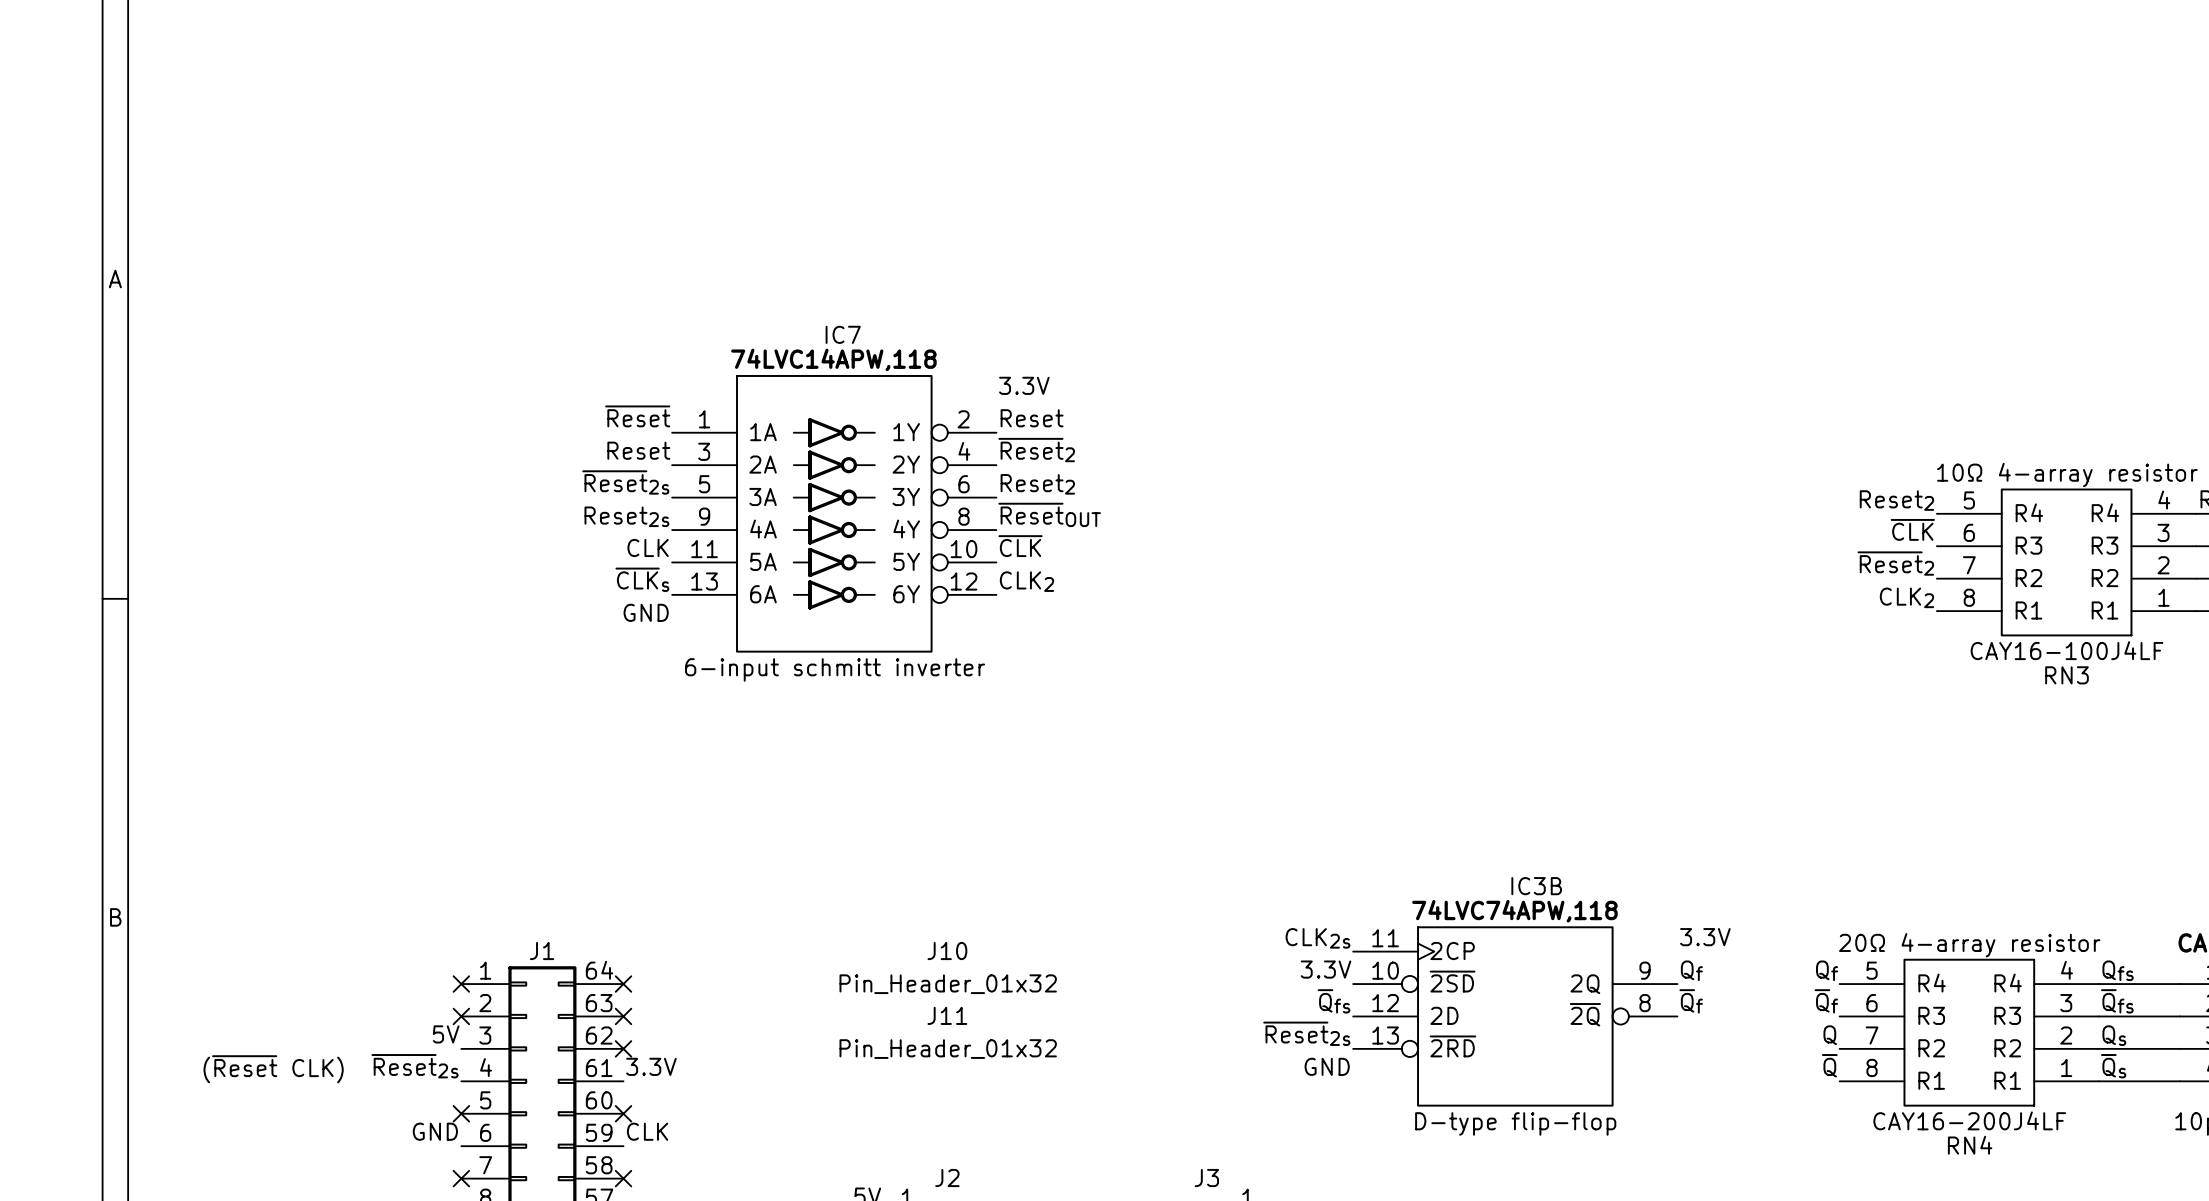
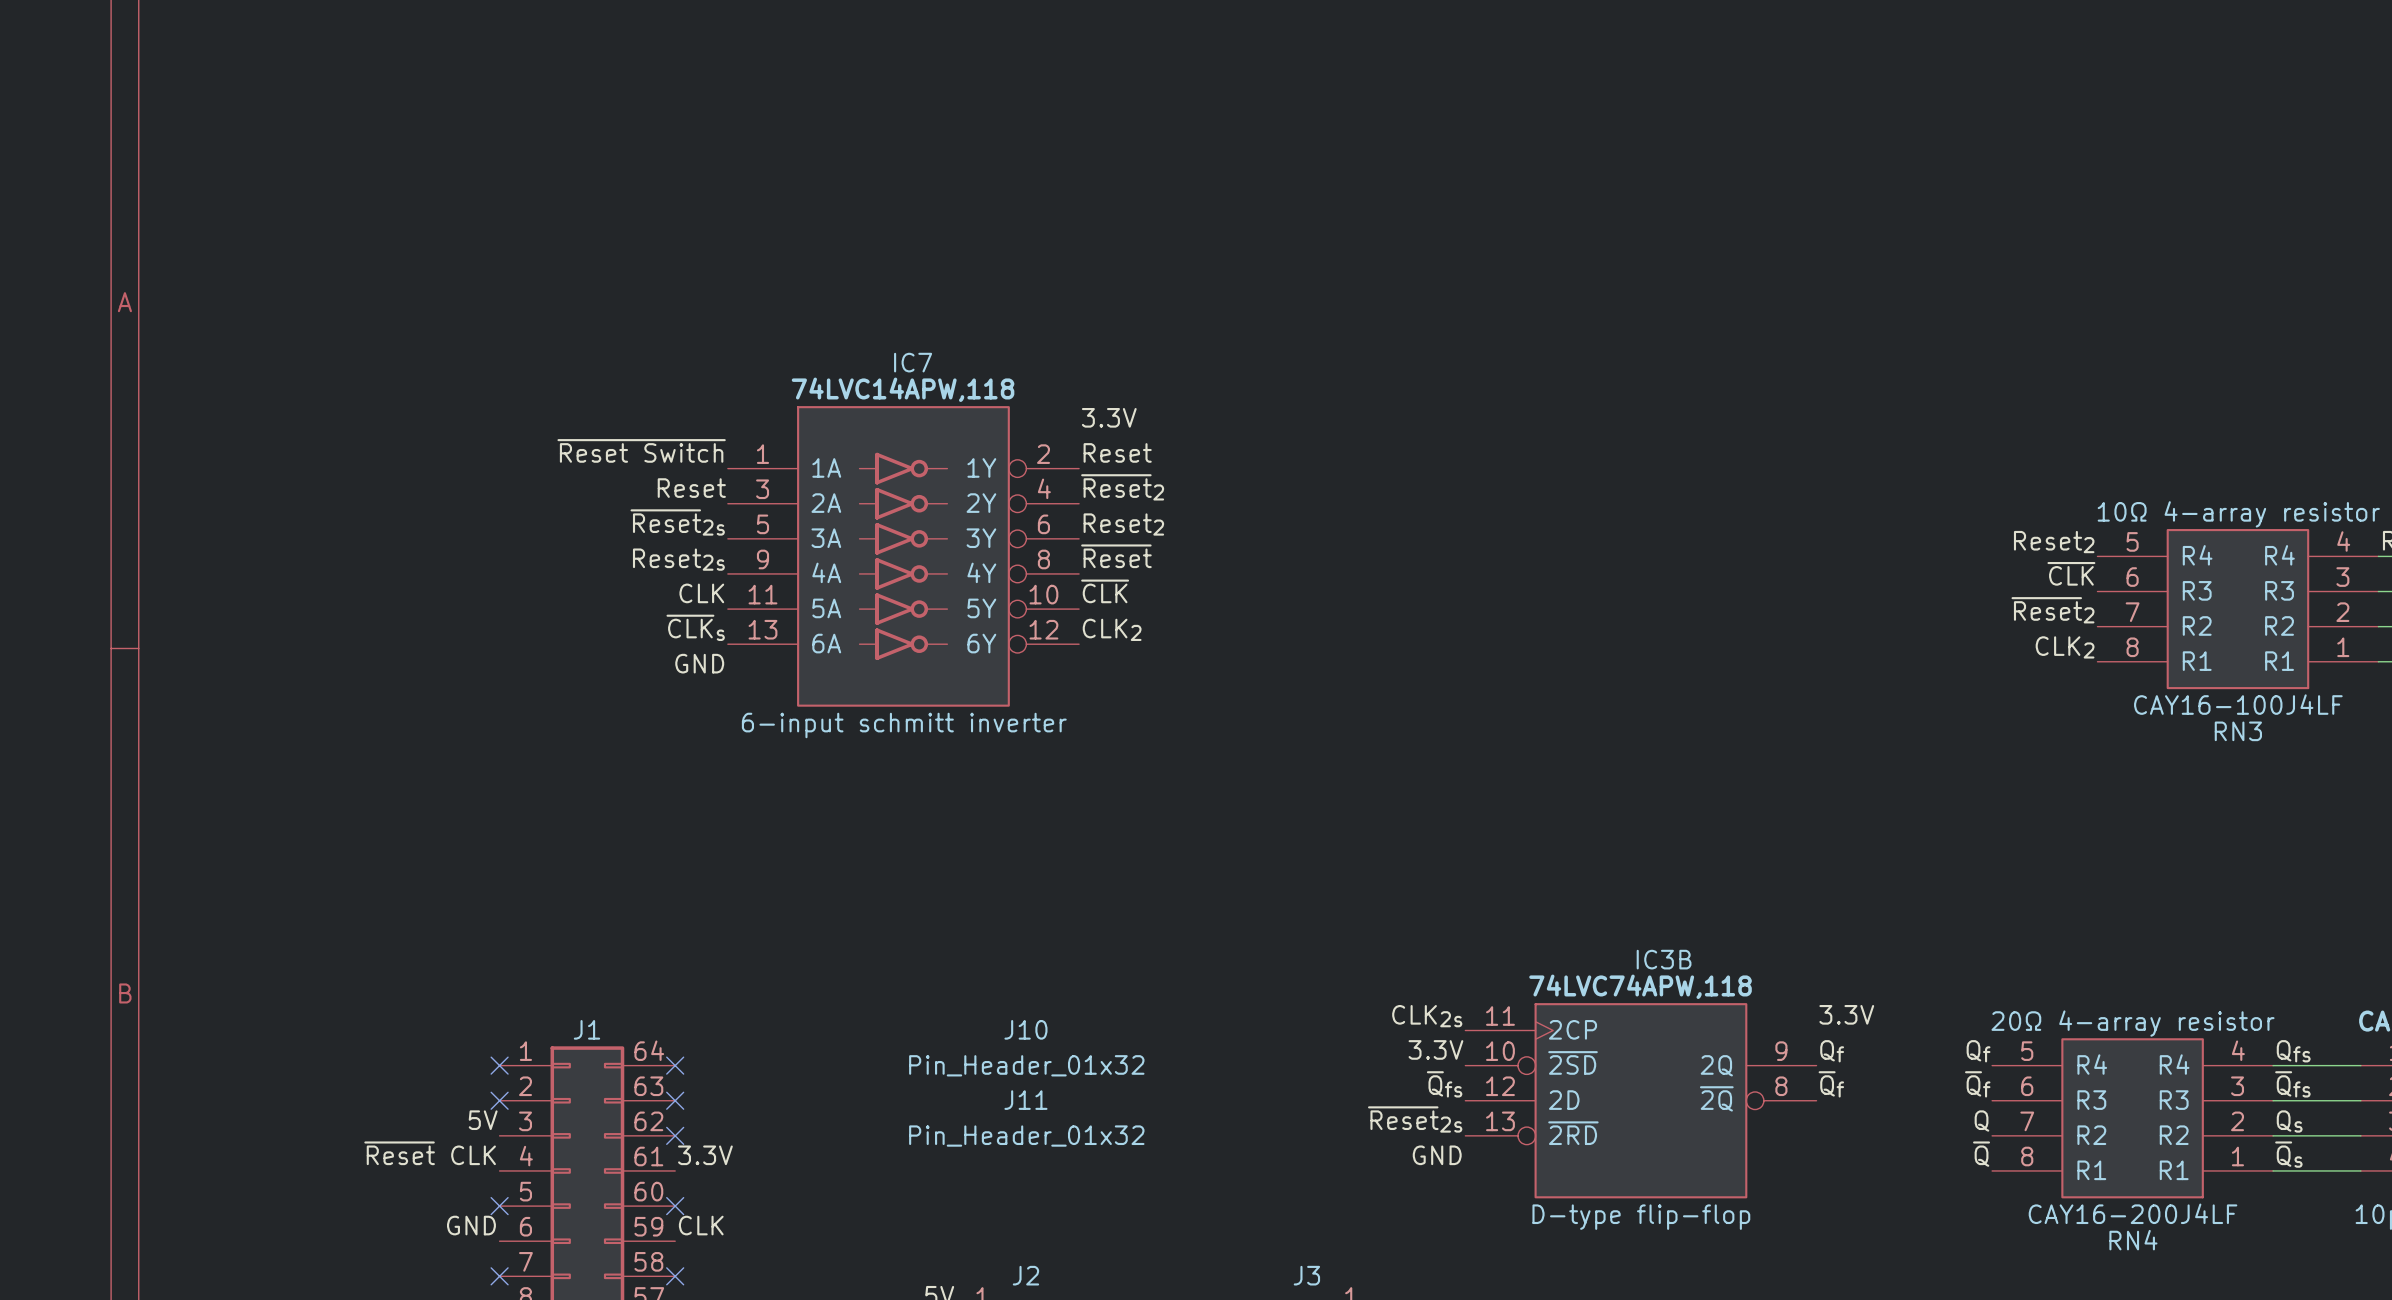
label: ~{Reset} (637, 416) -> ~{Reset Switch} (641, 450)
label: ~{Reset}OUT (1049, 514) -> ~{Reset} (1116, 556)
label: ~{Reset}2s (415, 1066) -> ~{Reset} CLK (430, 1153)
text: (~{Reset} CLK) (273, 1069) -> none

